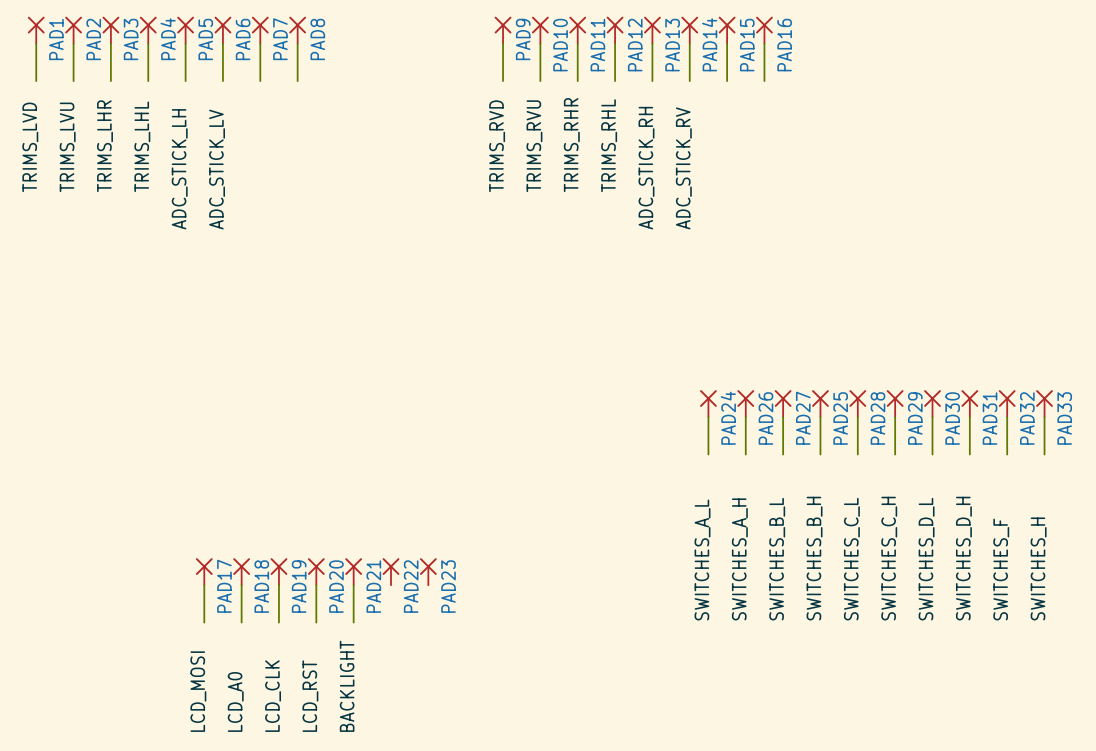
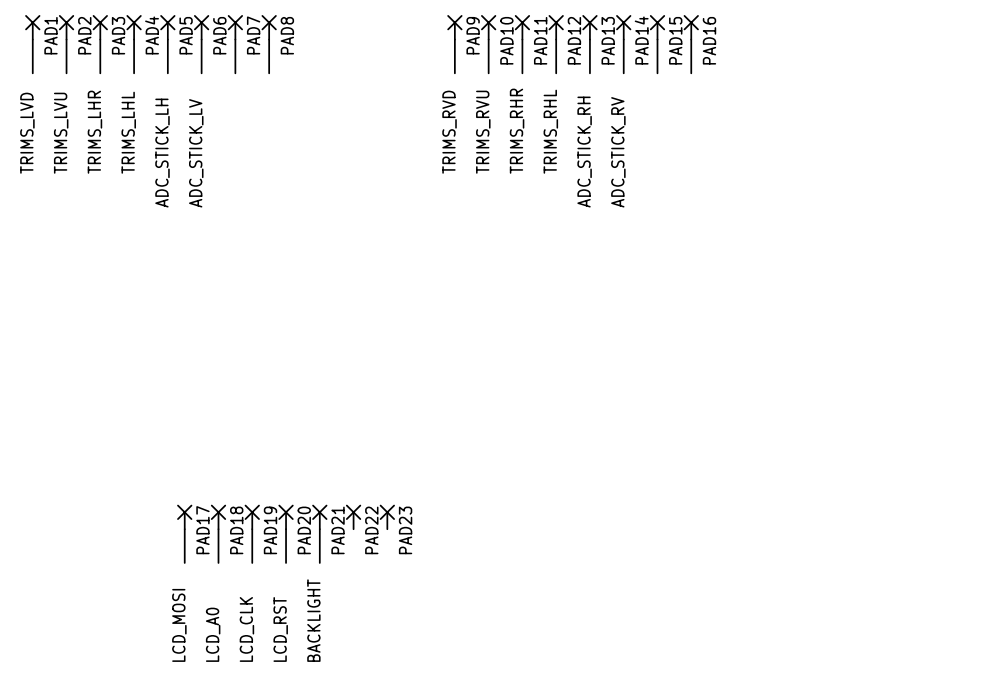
PAD24: (708, 403) -> none
PAD26: (745, 403) -> none
PAD27: (783, 403) -> none
PAD25: (820, 403) -> none
PAD28: (857, 403) -> none
PAD29: (895, 403) -> none
PAD30: (932, 403) -> none
PAD31: (969, 403) -> none
PAD32: (1007, 403) -> none
PAD33: (1044, 403) -> none
wire: (708, 417) (708, 454) -> none
wire: (745, 417) (745, 454) -> none
wire: (783, 417) (783, 454) -> none
wire: (820, 417) (820, 454) -> none
wire: (857, 417) (857, 454) -> none
wire: (895, 417) (895, 454) -> none
wire: (932, 417) (932, 454) -> none
wire: (969, 417) (969, 454) -> none
wire: (1007, 417) (1007, 454) -> none
wire: (1044, 417) (1044, 454) -> none
label: SWITCHES_B_H (814, 558) -> none
label: SWITCHES_C_H (889, 558) -> none
label: SWITCHES_D_H (963, 558) -> none
label: SWITCHES_A_L (702, 559) -> none
label: SWITCHES_A_H (739, 559) -> none
label: SWITCHES_B_L (777, 559) -> none
label: SWITCHES_C_L (851, 559) -> none
label: SWITCHES_D_L (926, 559) -> none
label: SWITCHES_H (1038, 568) -> none
label: SWITCHES_F (1001, 569) -> none

